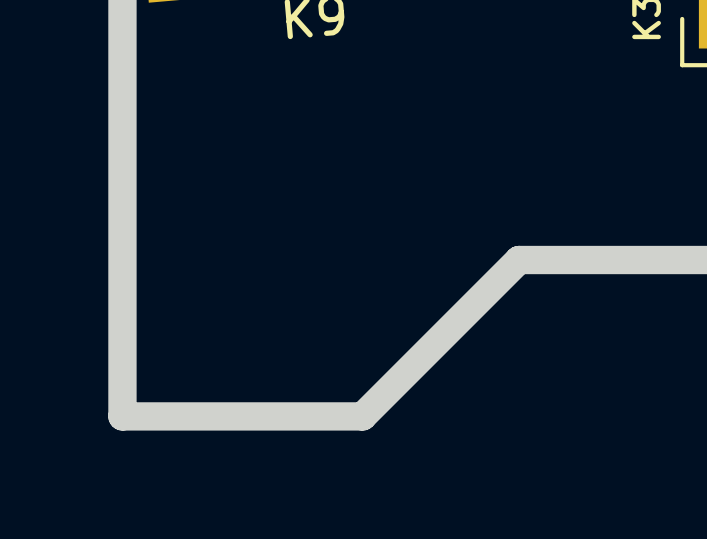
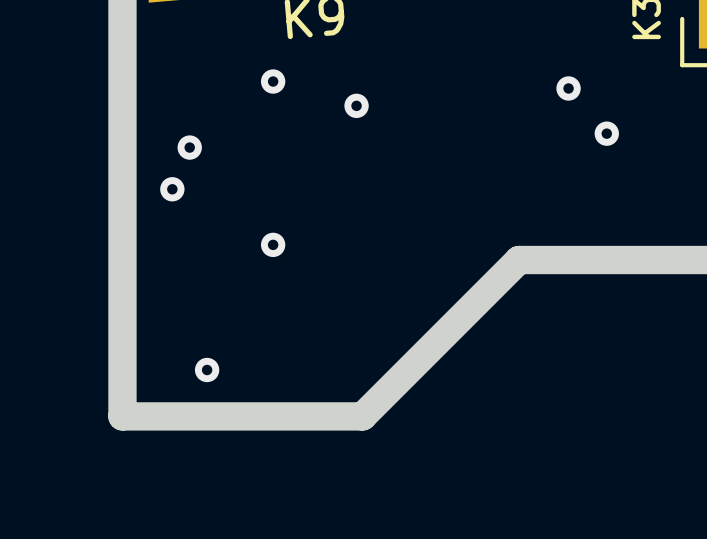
via: none -> (273, 81)
via: none -> (568, 88)
via: none -> (356, 105)
via: none -> (606, 133)
via: none -> (189, 147)
via: none -> (172, 189)
via: none -> (273, 244)
via: none -> (207, 370)

